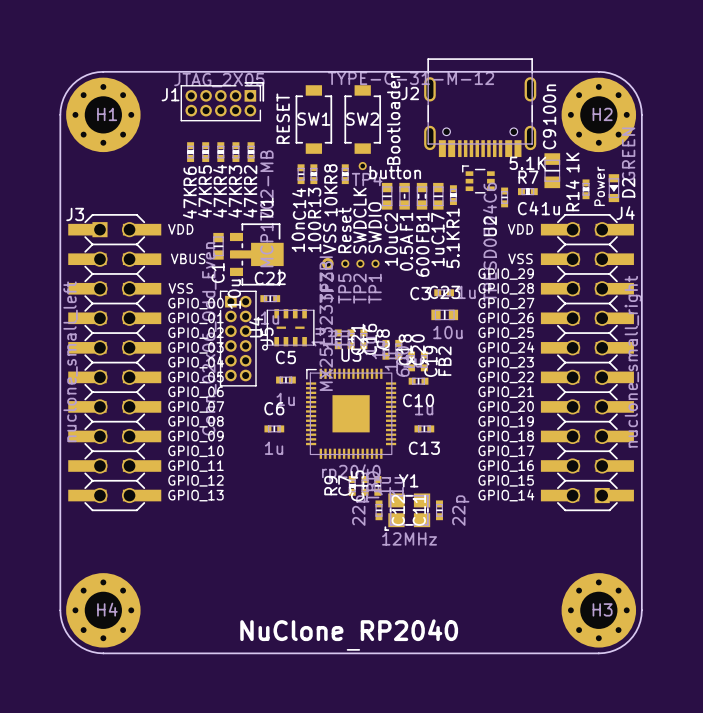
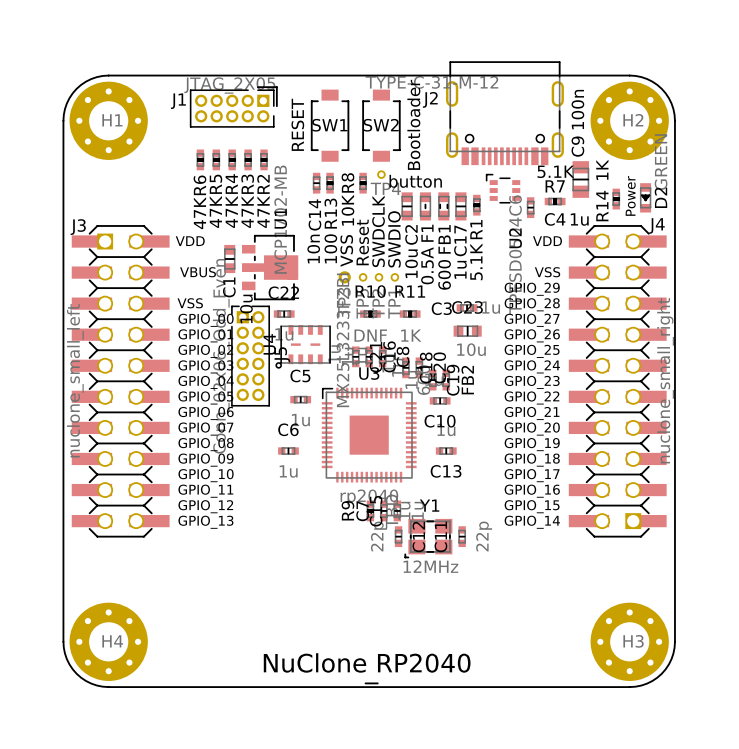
R10: none -> DNF (370, 314)
R11: none -> 1K (410, 314)

